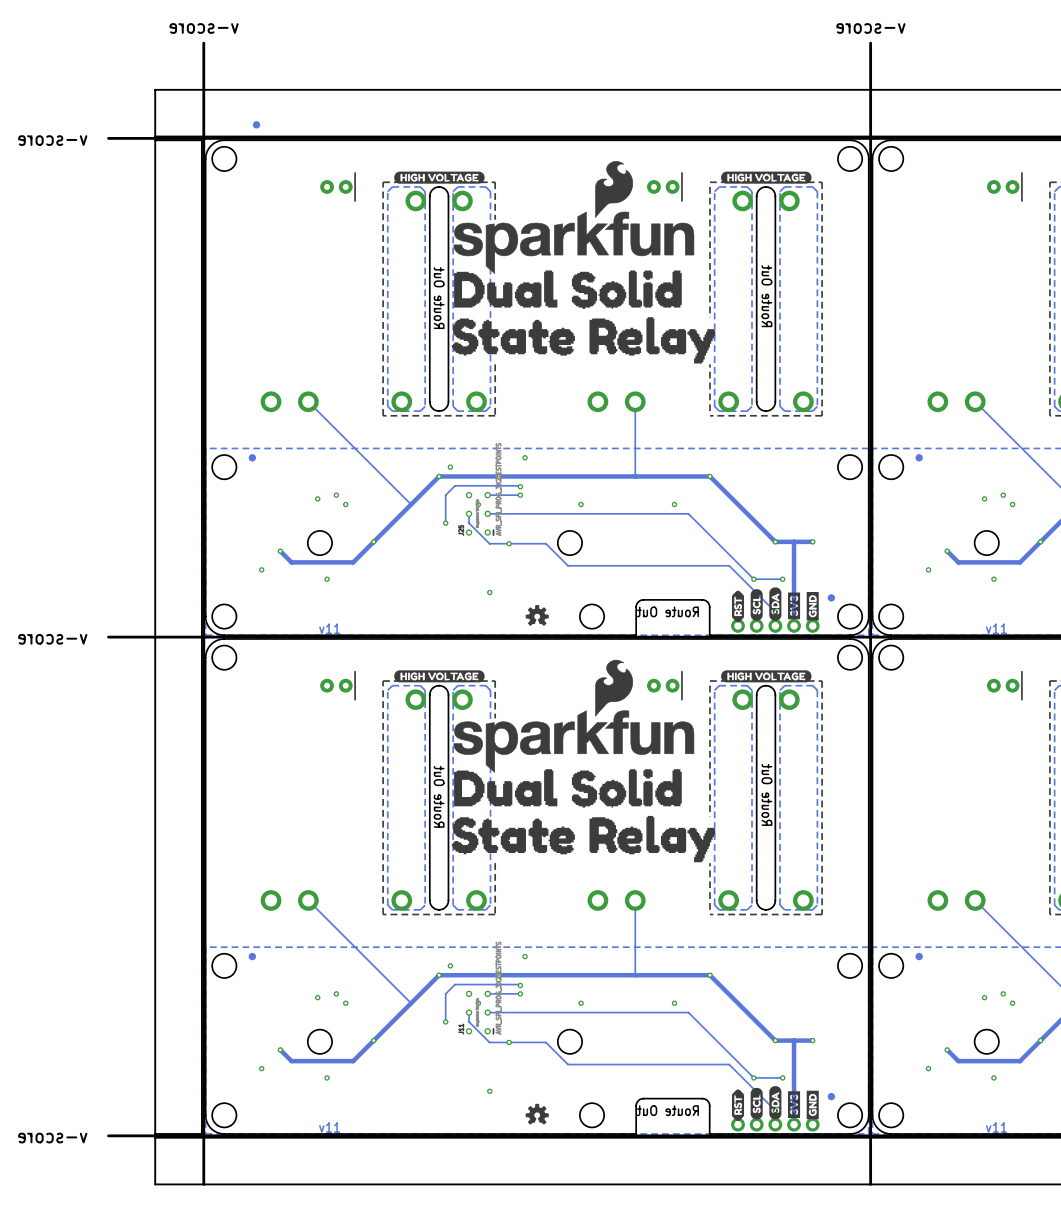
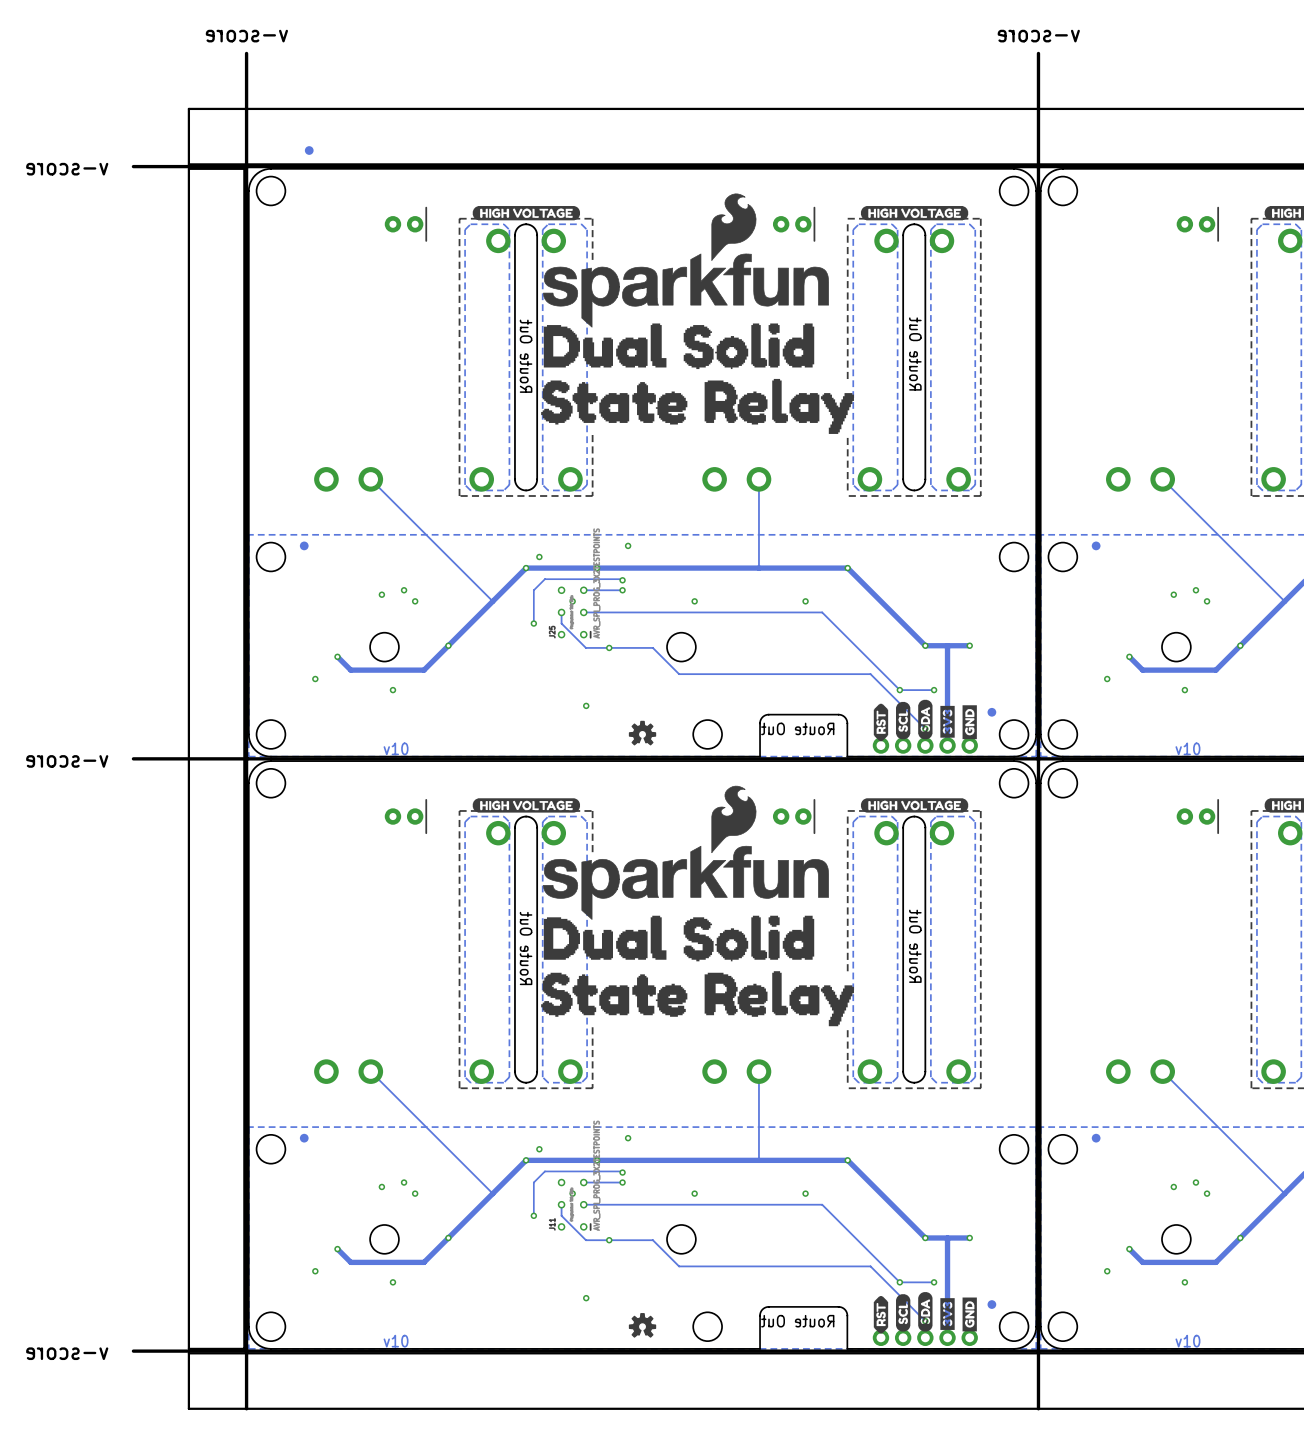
text: v11 (329, 628) -> v10 (396, 748)
text: v11 (996, 628) -> v10 (1187, 748)
text: v11 (329, 1127) -> v10 (396, 1341)
text: v11 (996, 1127) -> v10 (1187, 1341)

